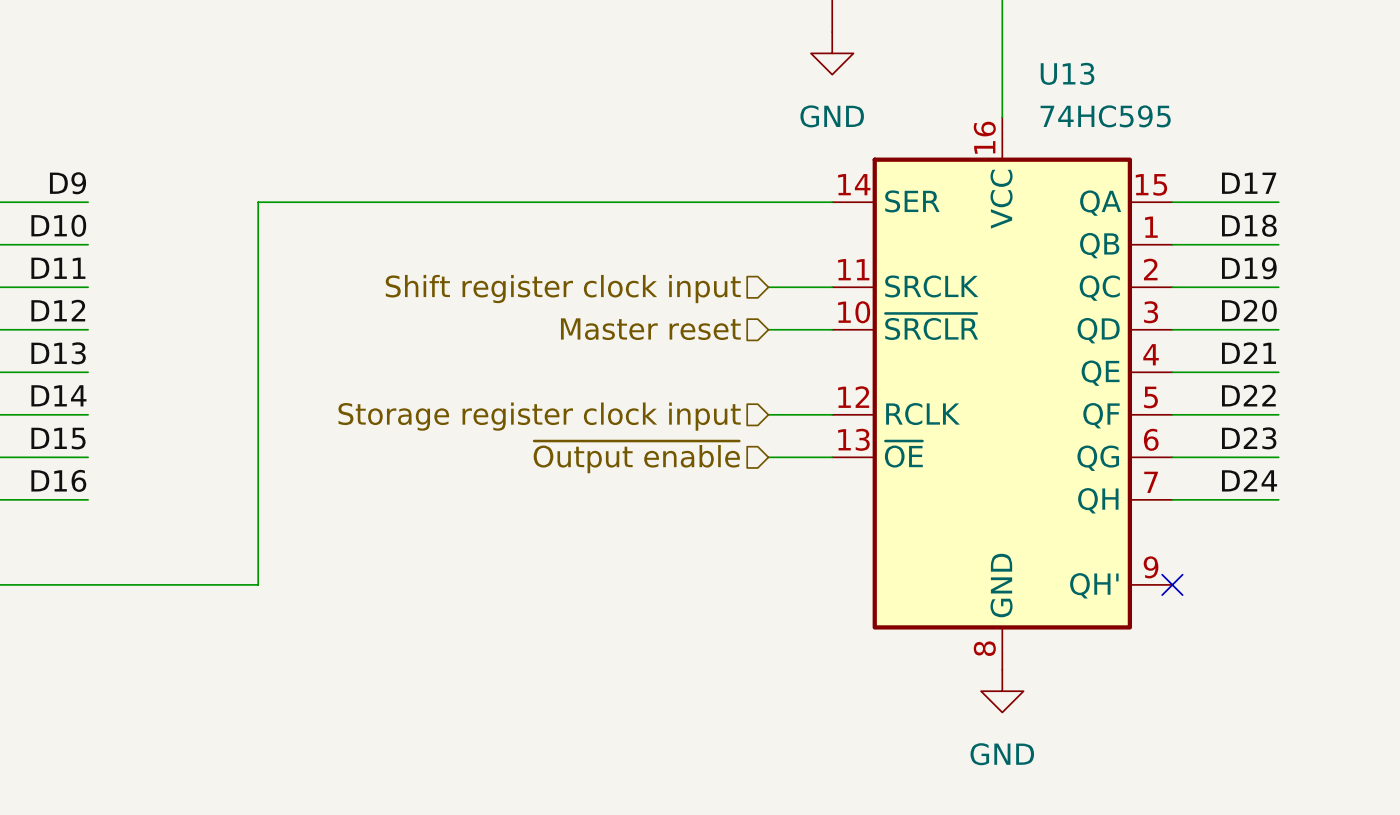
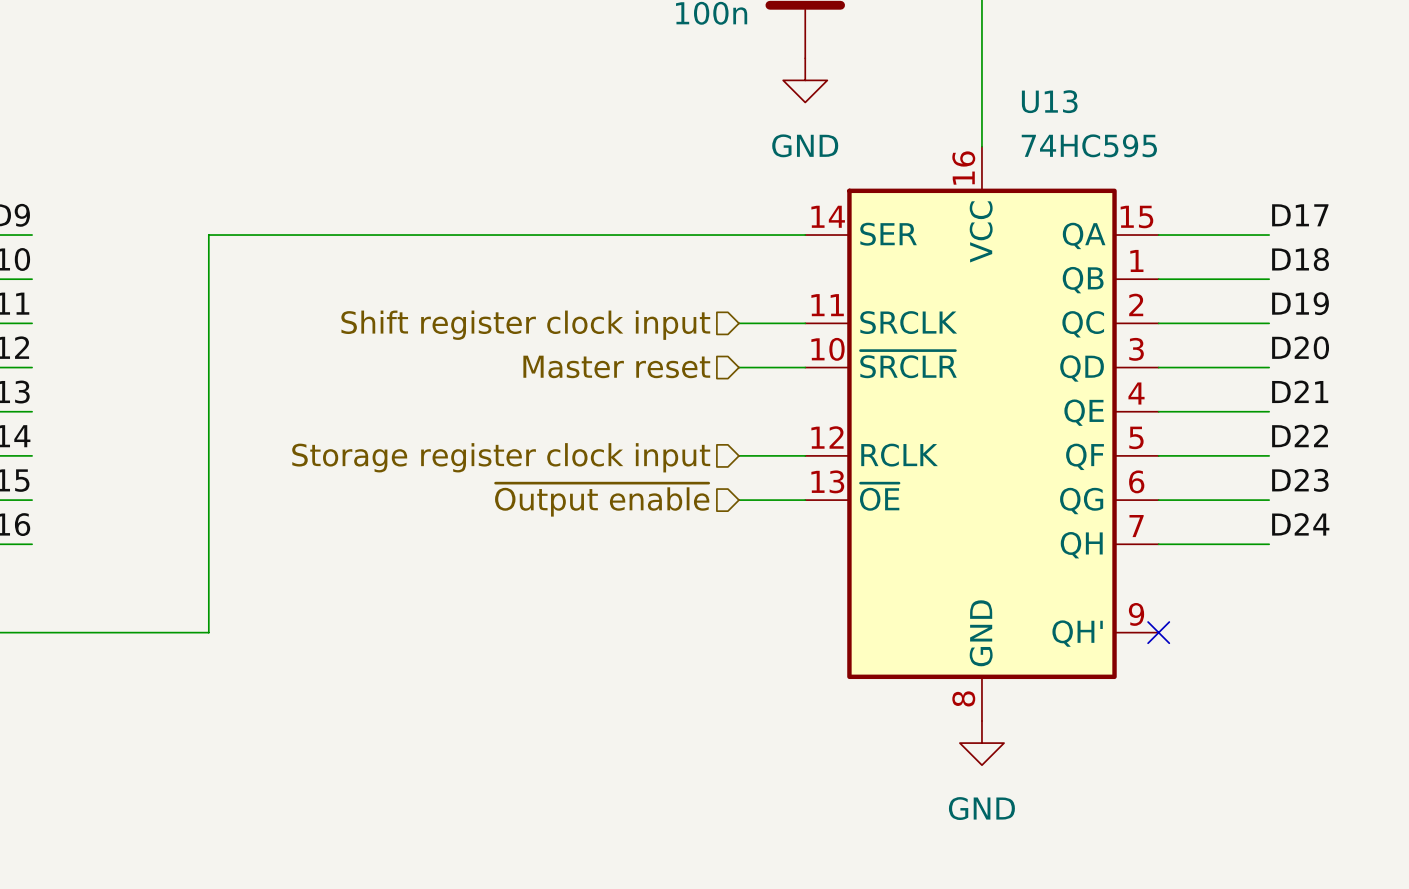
label position: D17 (1249, 183) -> D17 (1300, 215)
label position: D18 (1249, 225) -> D18 (1300, 259)
label position: D19 (1249, 268) -> D19 (1300, 303)
label position: D20 (1249, 310) -> D20 (1300, 347)
label position: D21 (1249, 353) -> D21 (1300, 391)
label position: D22 (1248, 395) -> D22 (1300, 436)
label position: D23 (1249, 438) -> D23 (1300, 480)
label position: D24 (1249, 480) -> D24 (1300, 524)

